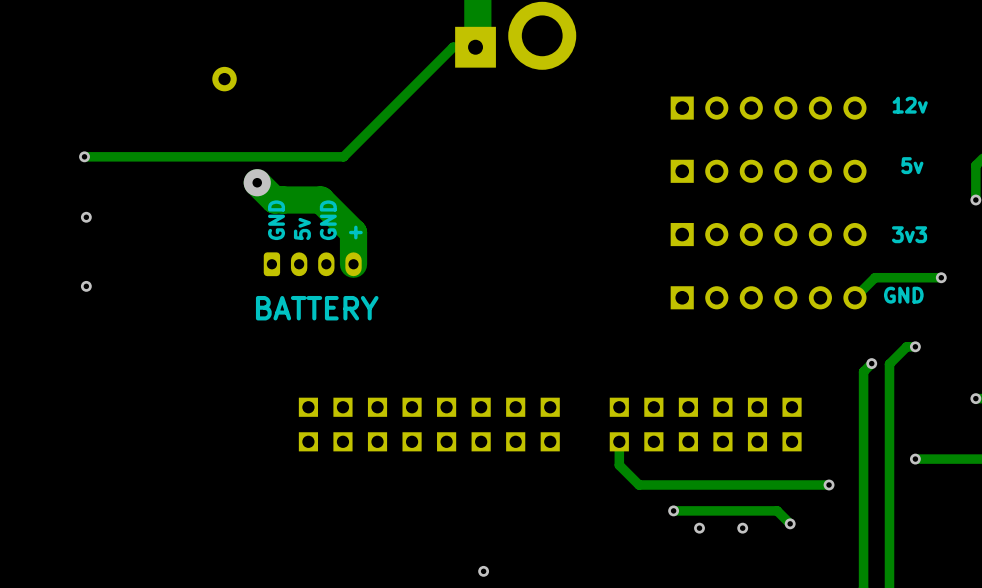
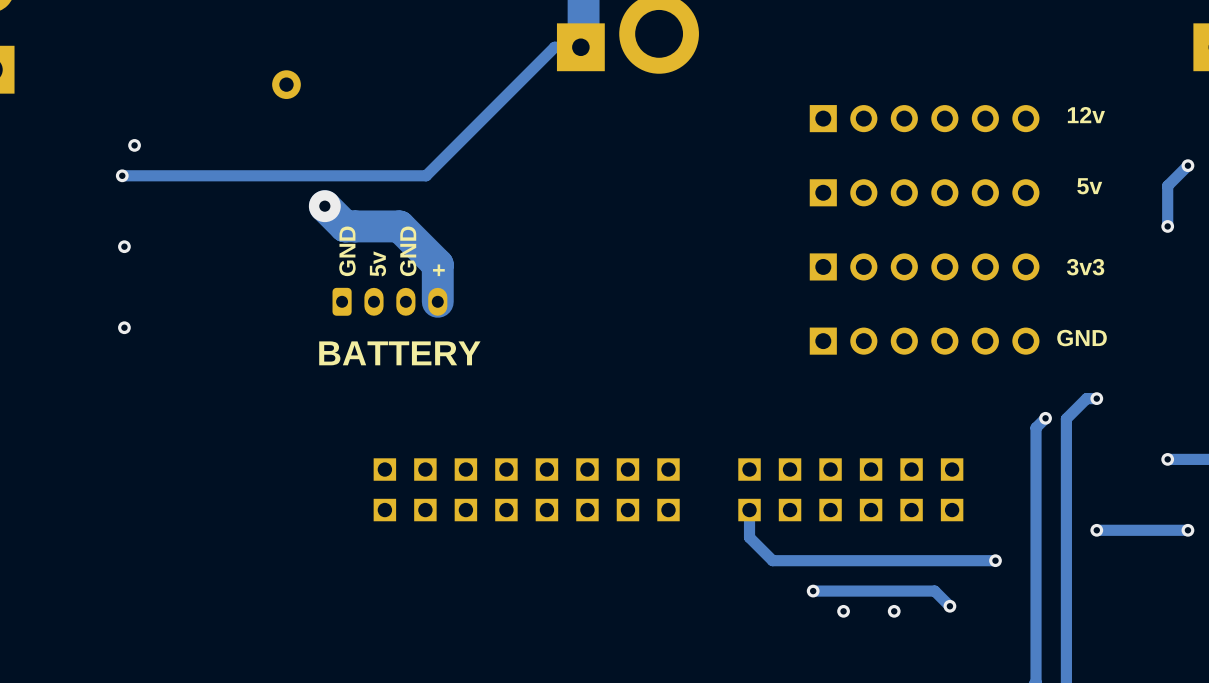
via: none -> (134, 145)
track: (941, 277) (875, 277) (854, 297) -> none
via: (941, 277) -> none
via: (483, 571) -> none

